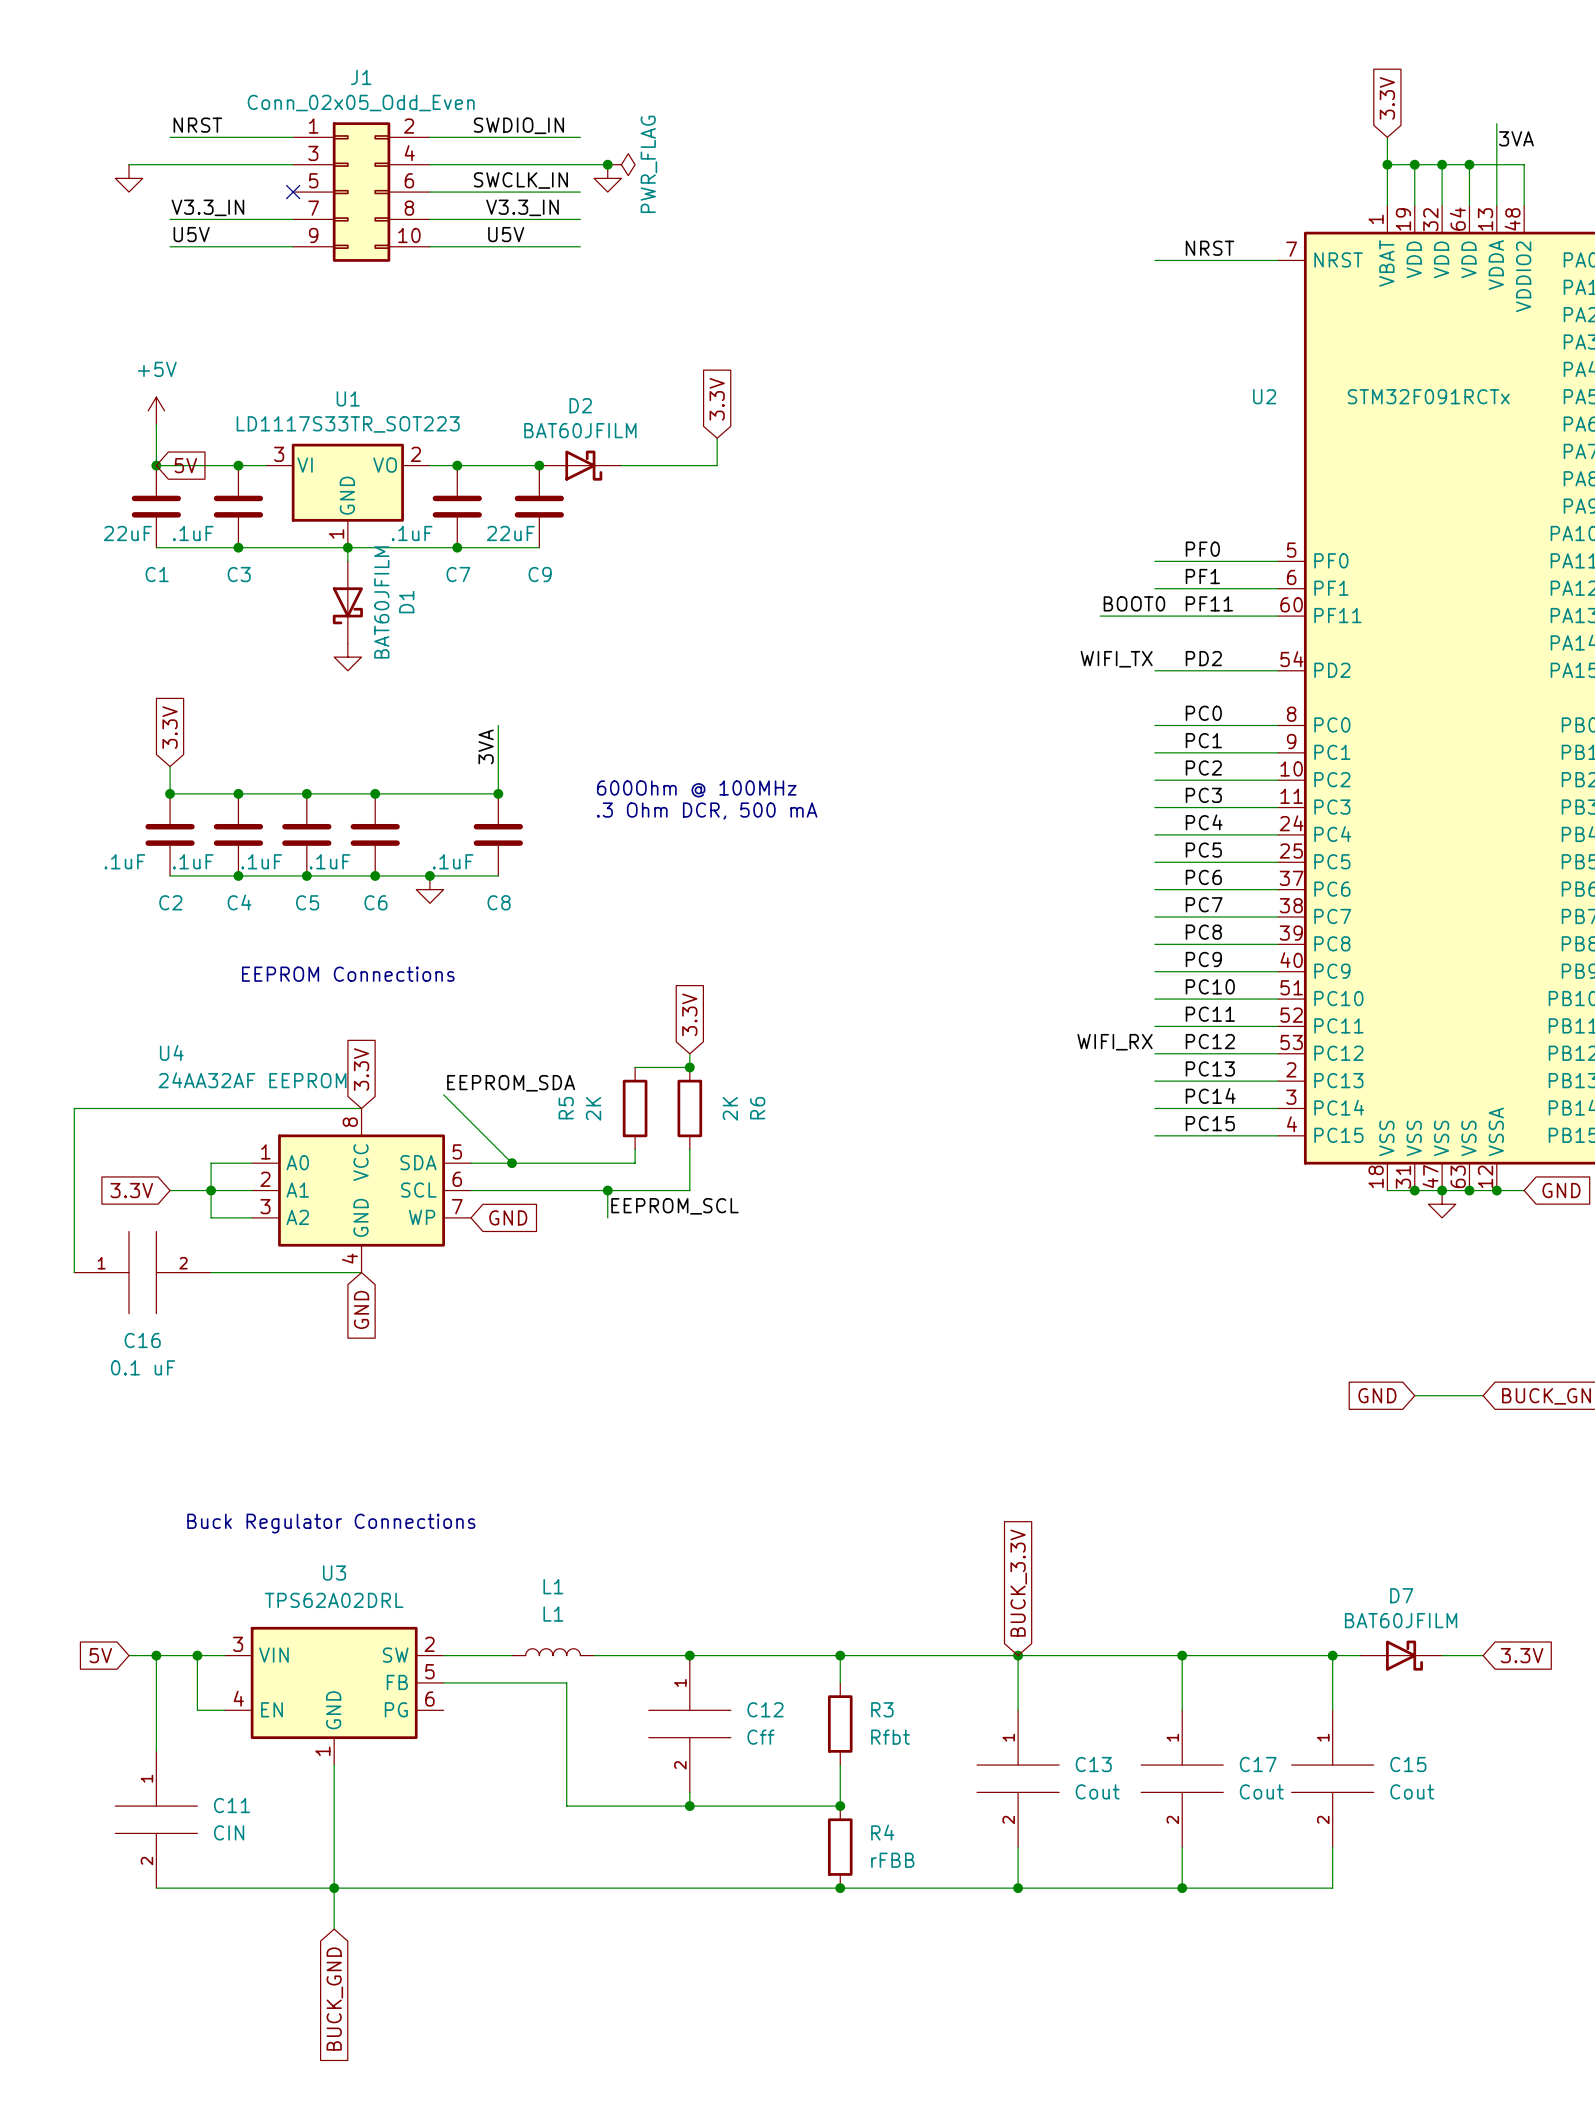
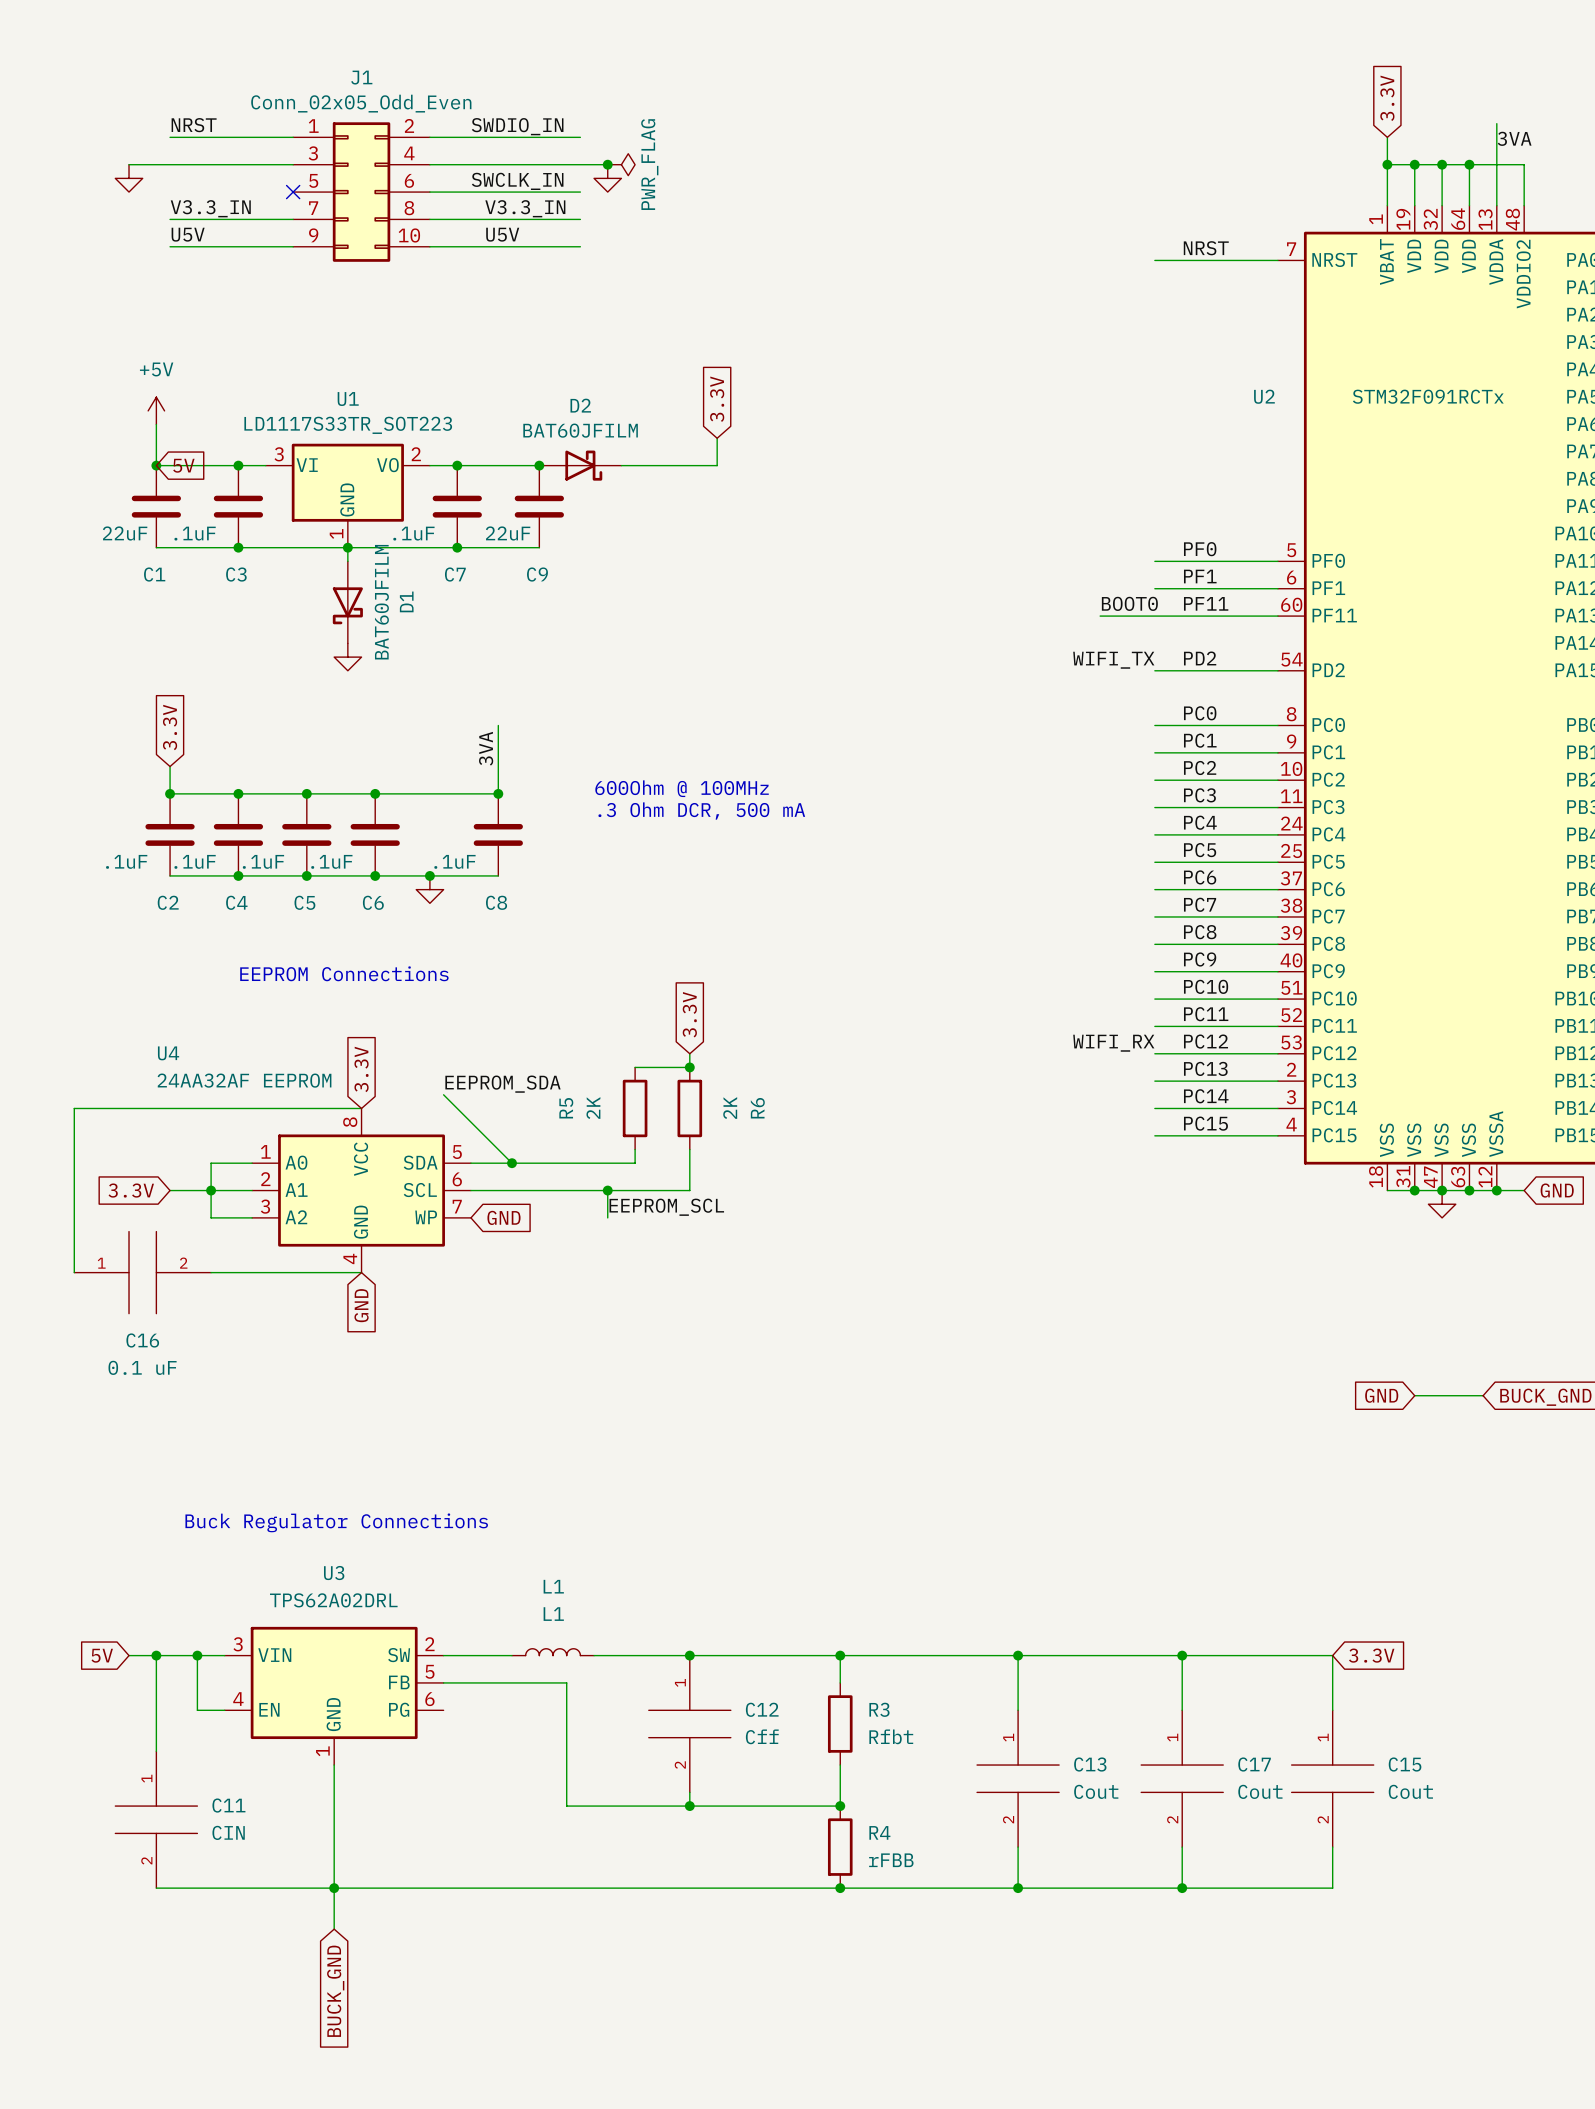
global label: BUCK_3.3V (1018, 1583) -> none
wire: (1332, 1655) (1360, 1655) -> none
junction: (1332, 1655) -> none
D7: BAT60JFILM (1401, 1655) -> none
wire: (1442, 1655) (1483, 1655) -> none
global label position: 3.3V (1522, 1655) -> 3.3V (1371, 1655)

